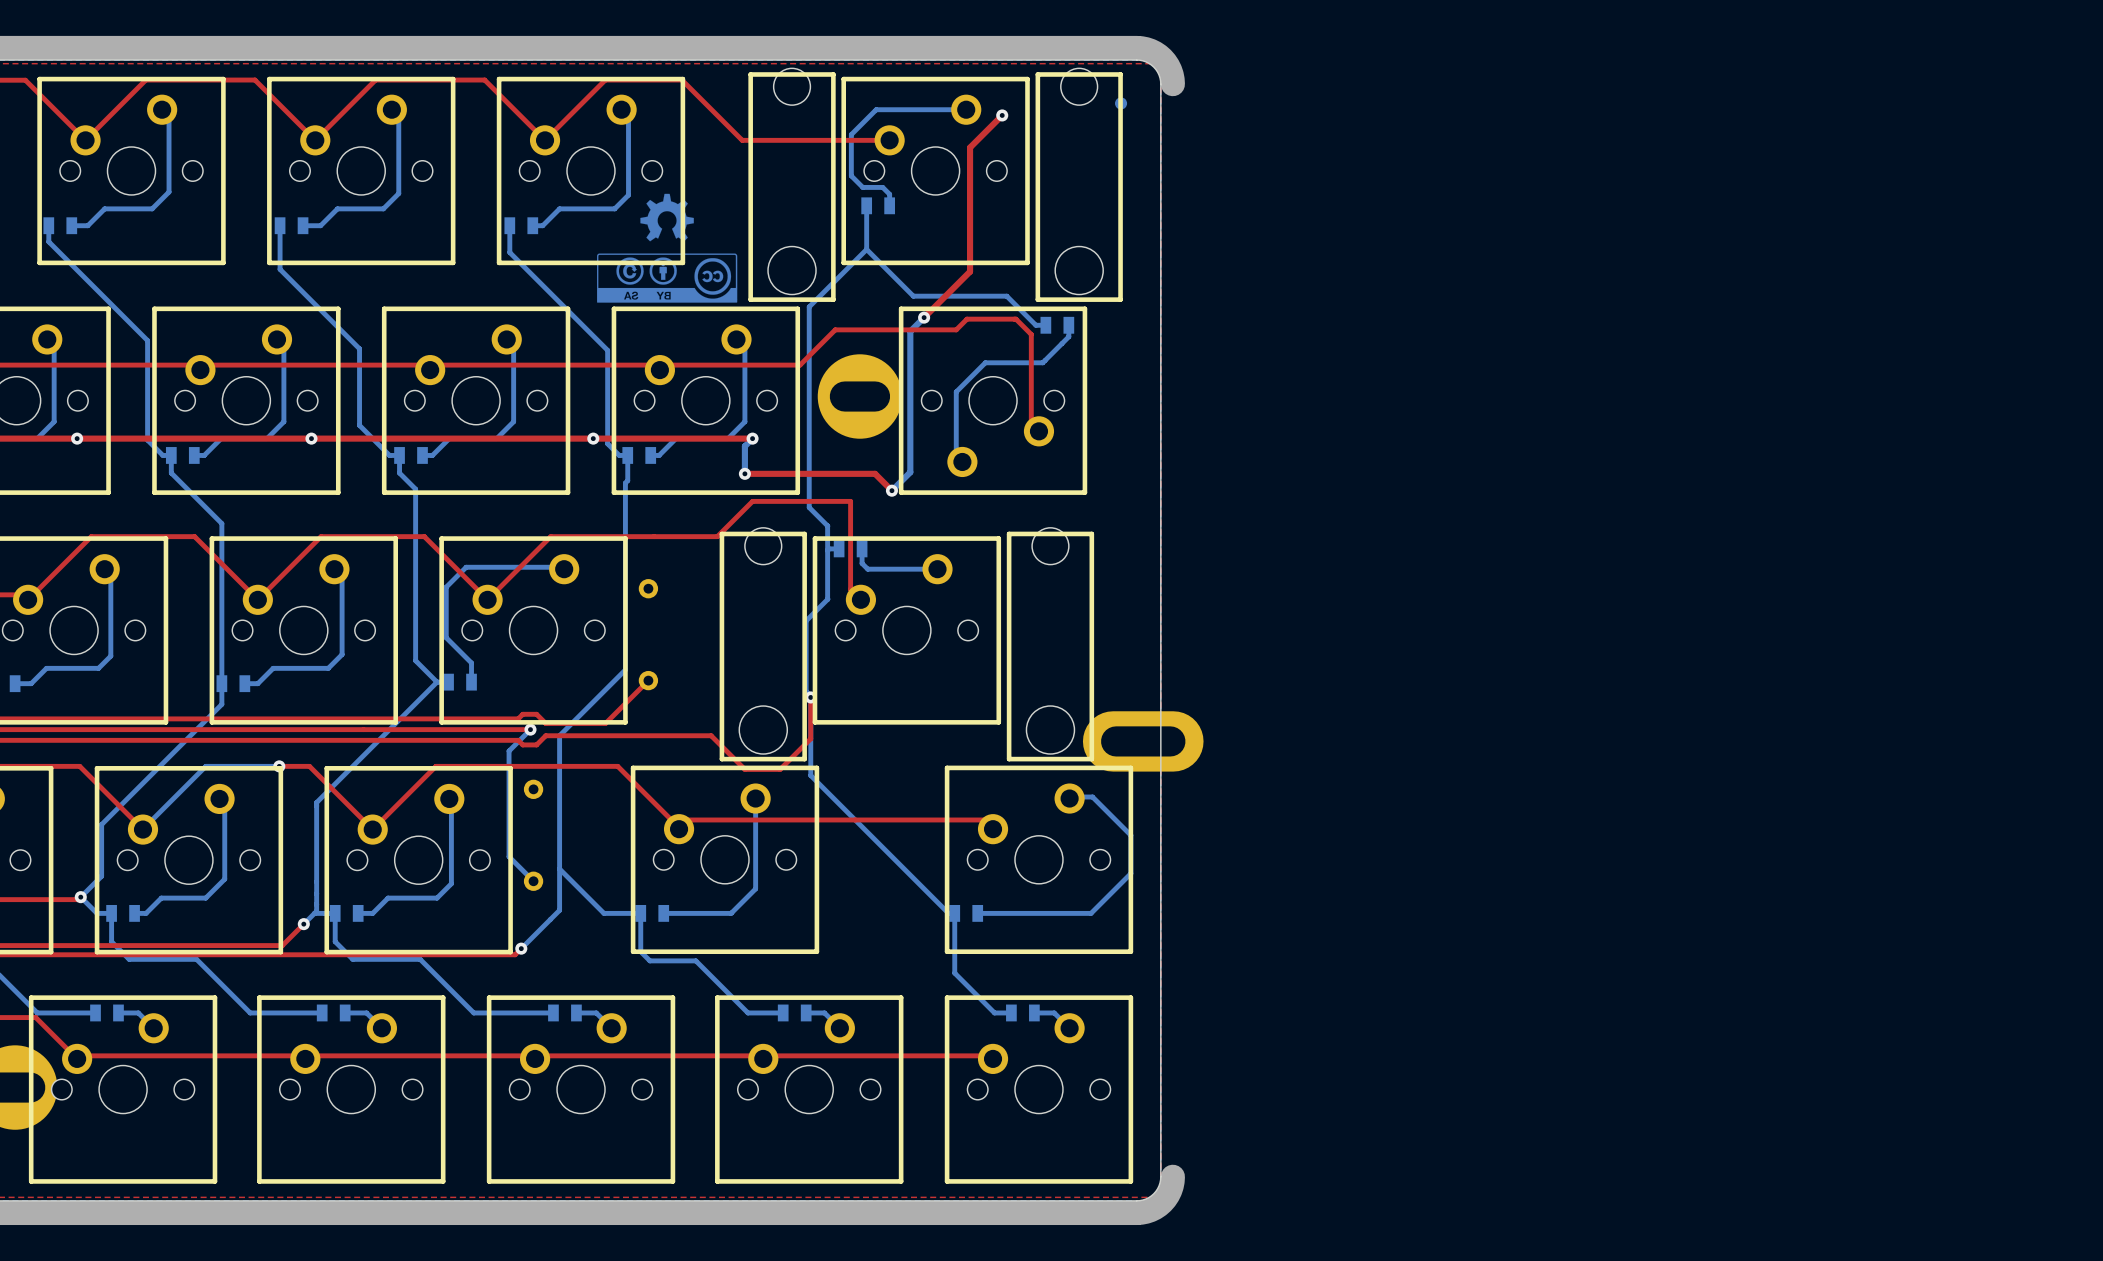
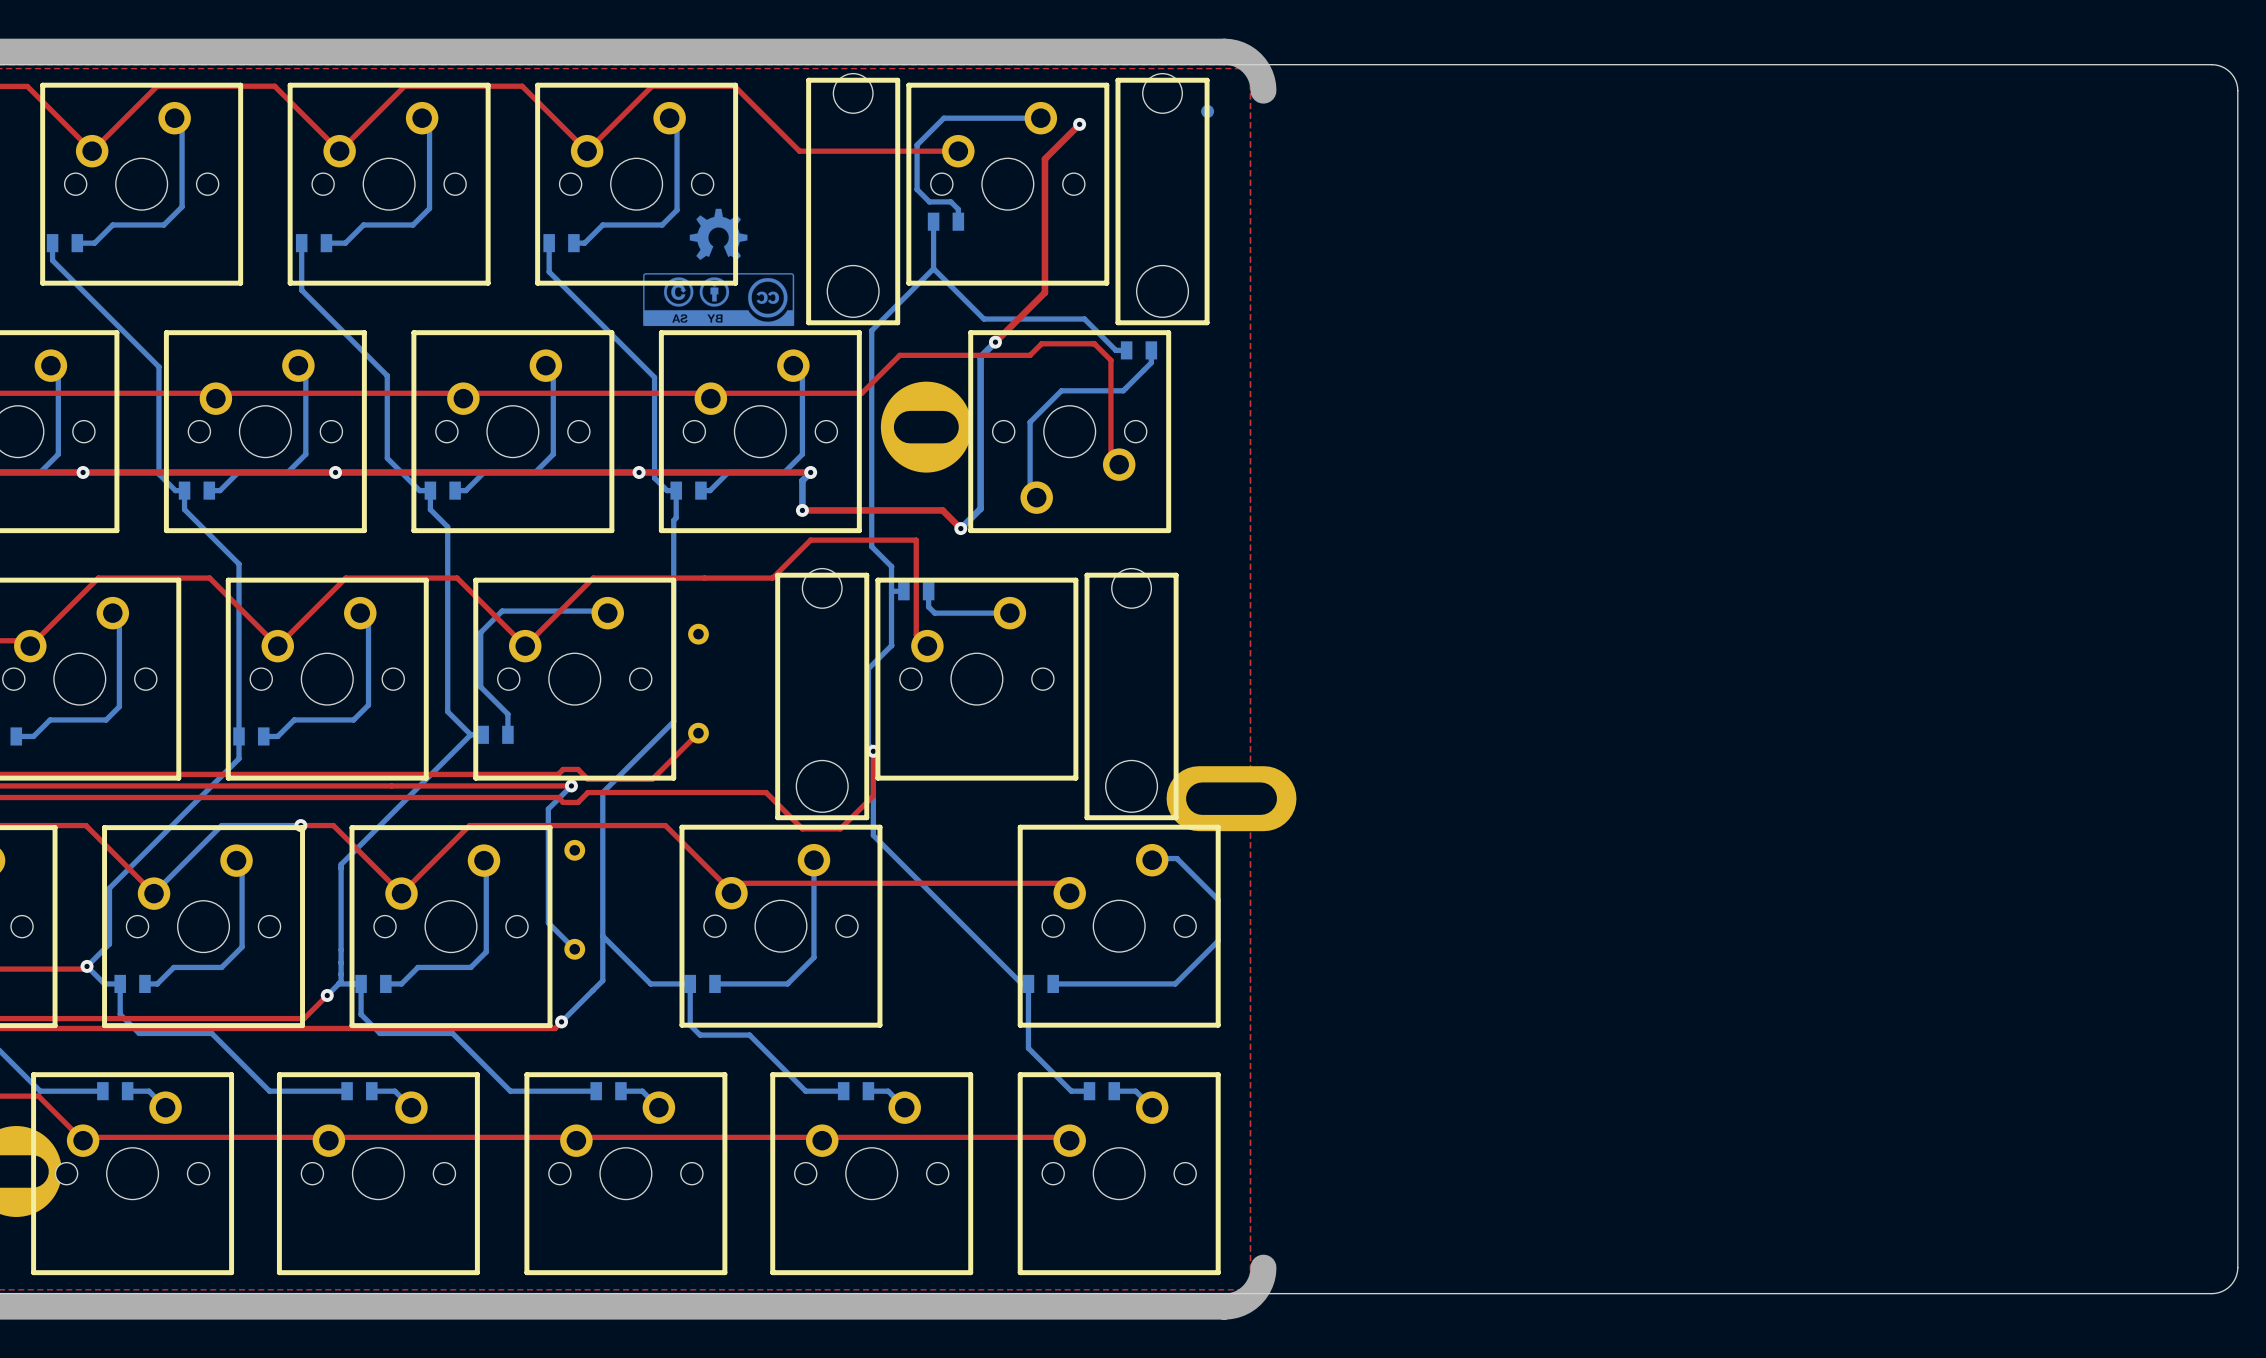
board edge: (1136, 60) (1145, 61) (1153, 67) (1159, 74) (1160, 84) (1160, 1176) (1159, 1186) (1153, 1193) (1145, 1199) (1136, 1200) -> (1224, 64) (2211, 64) (2221, 66) (2230, 72) (2235, 80) (2237, 90) (2237, 1267) (2232, 1283) (2221, 1291) (2211, 1293) (1224, 1293)

